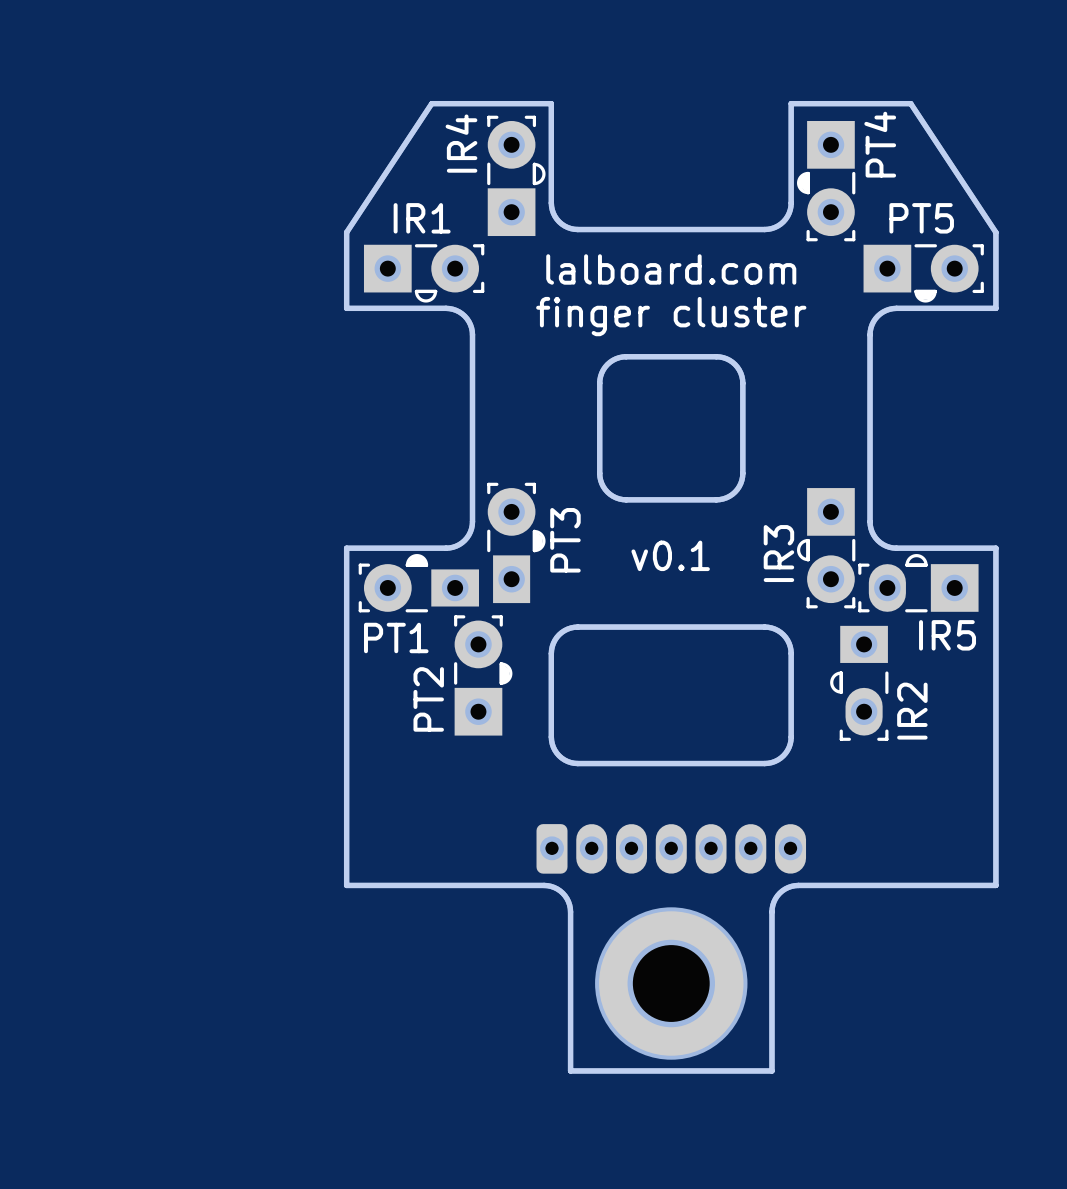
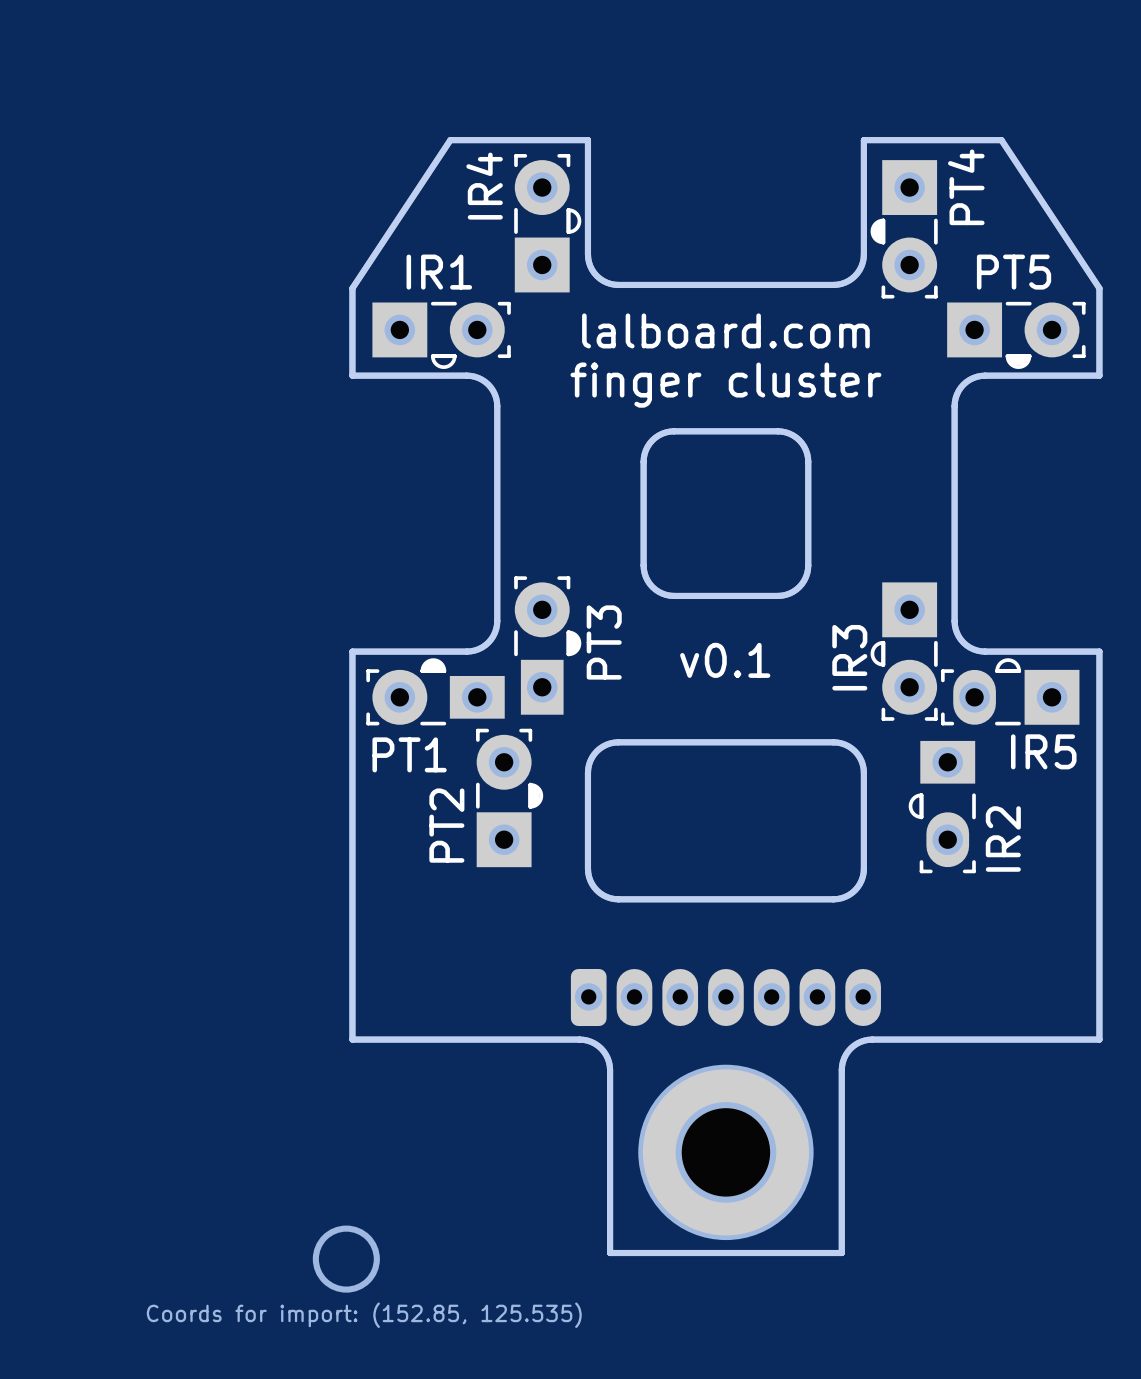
drawing: none -> [312, 1225, 380, 1293]
text: none -> Coords for import: (152.85, 125.535) (364, 1315)

